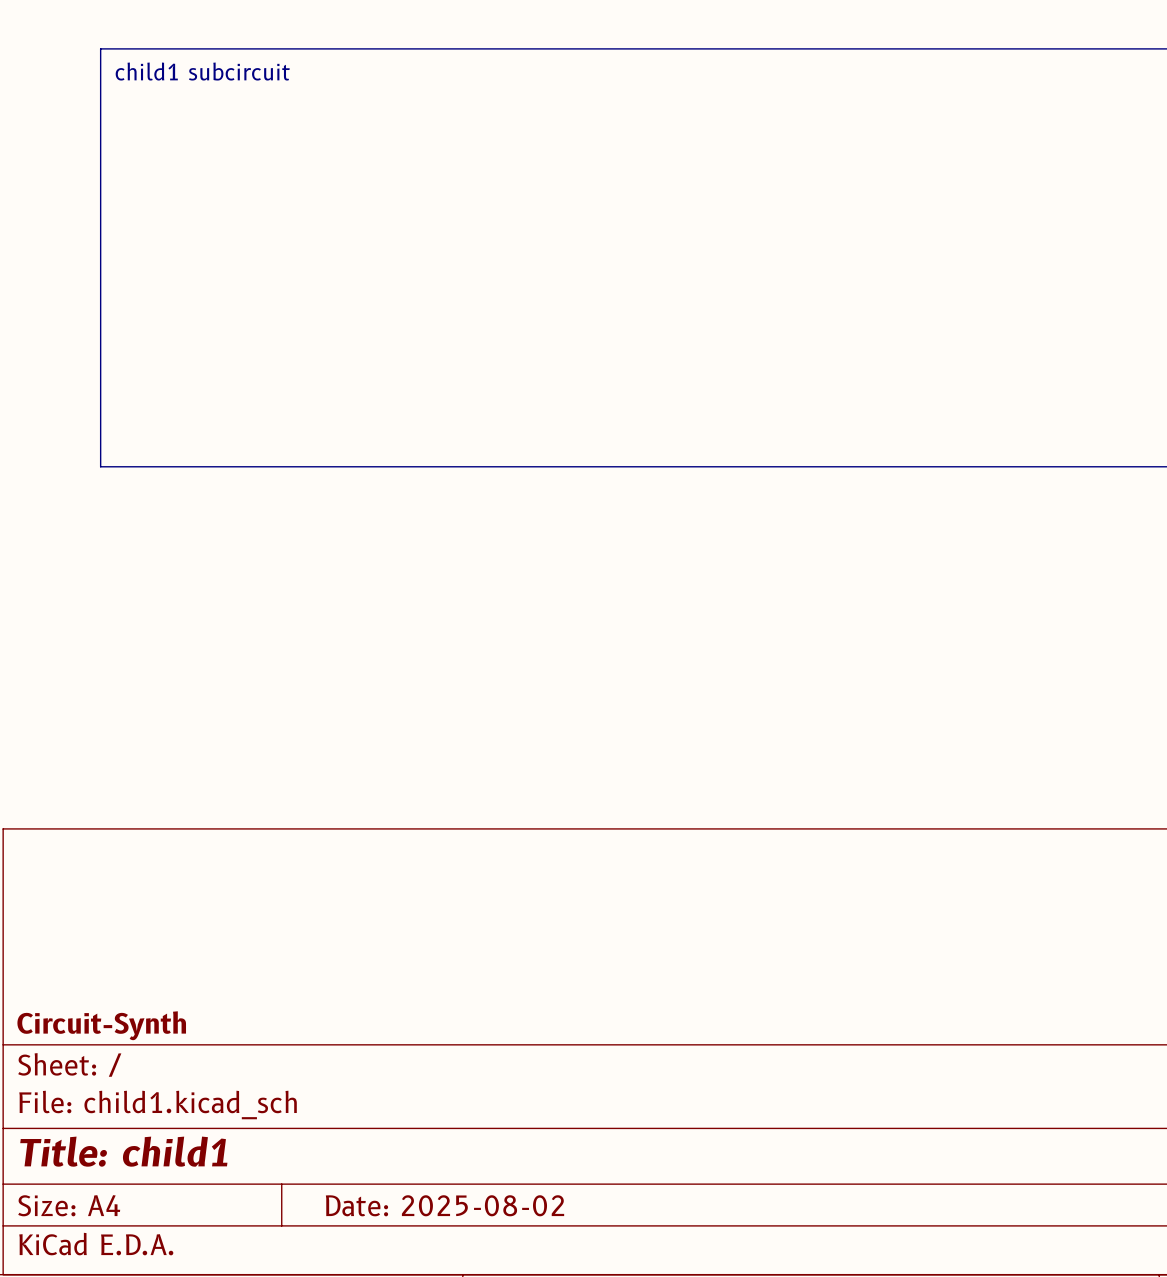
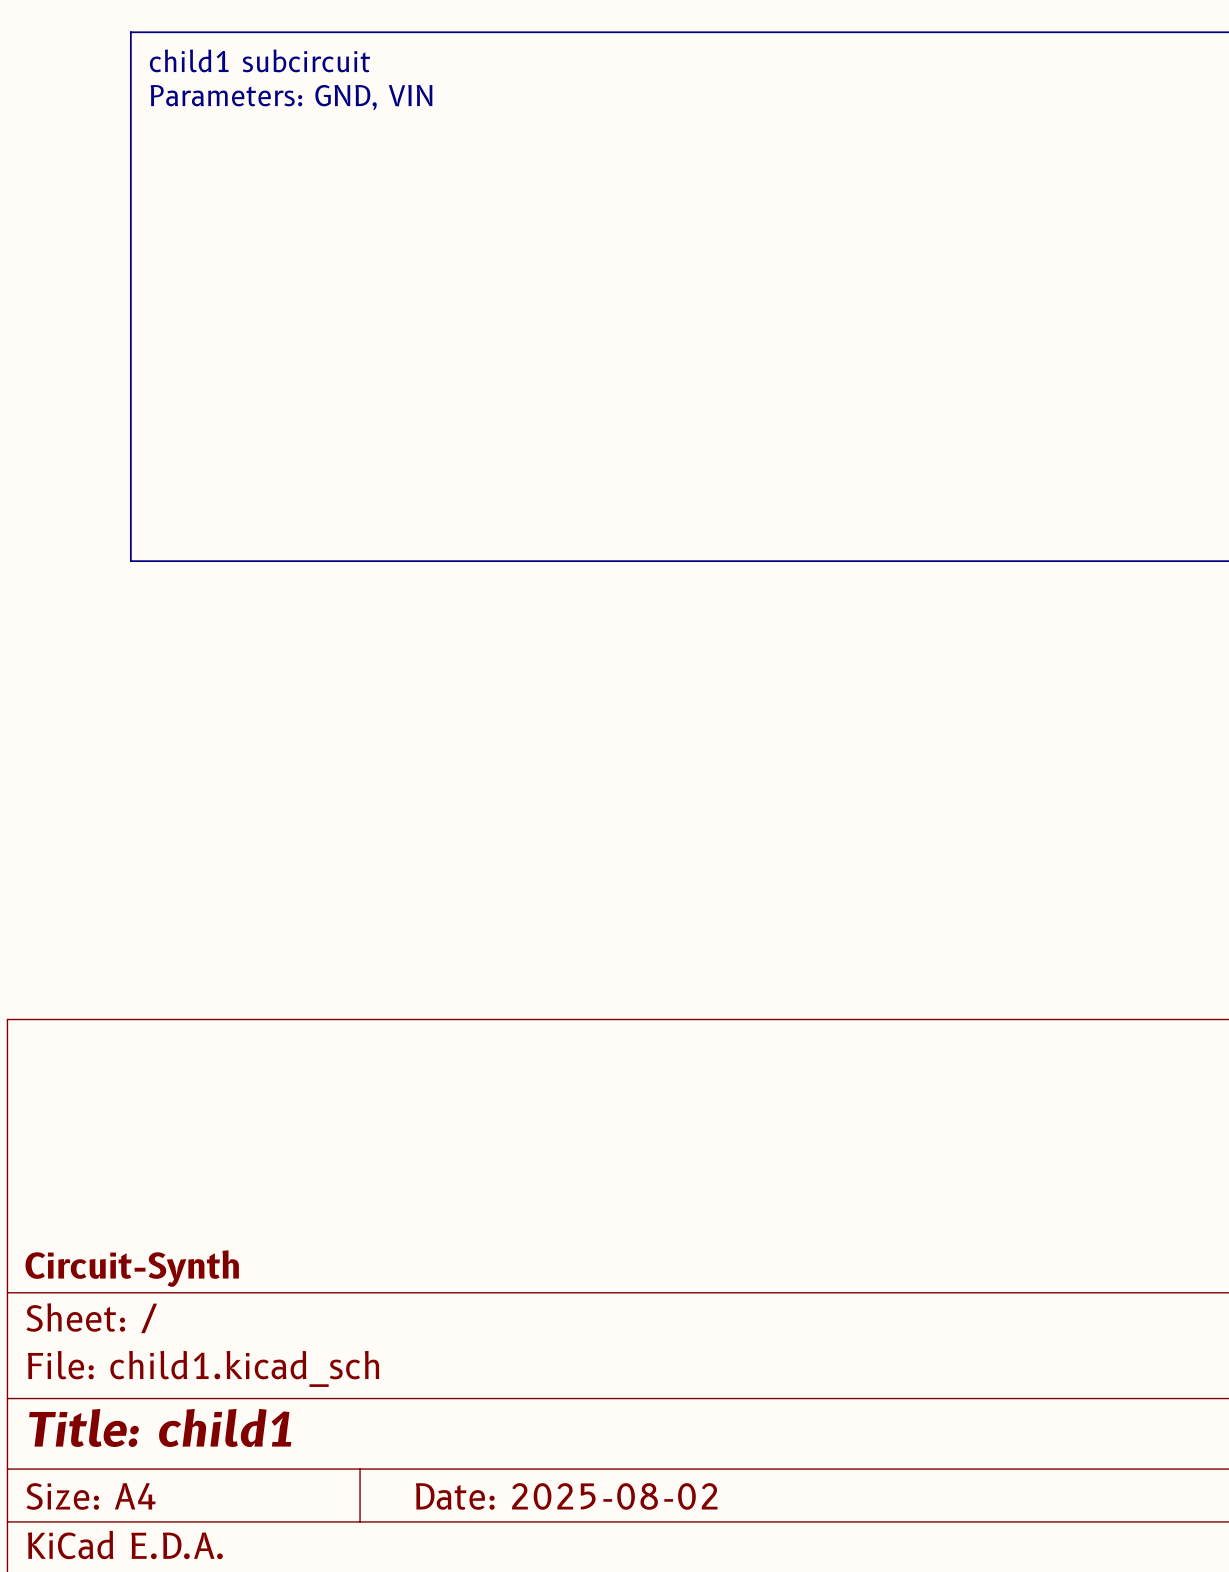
text: none -> Parameters: GND, VIN (291, 97)

